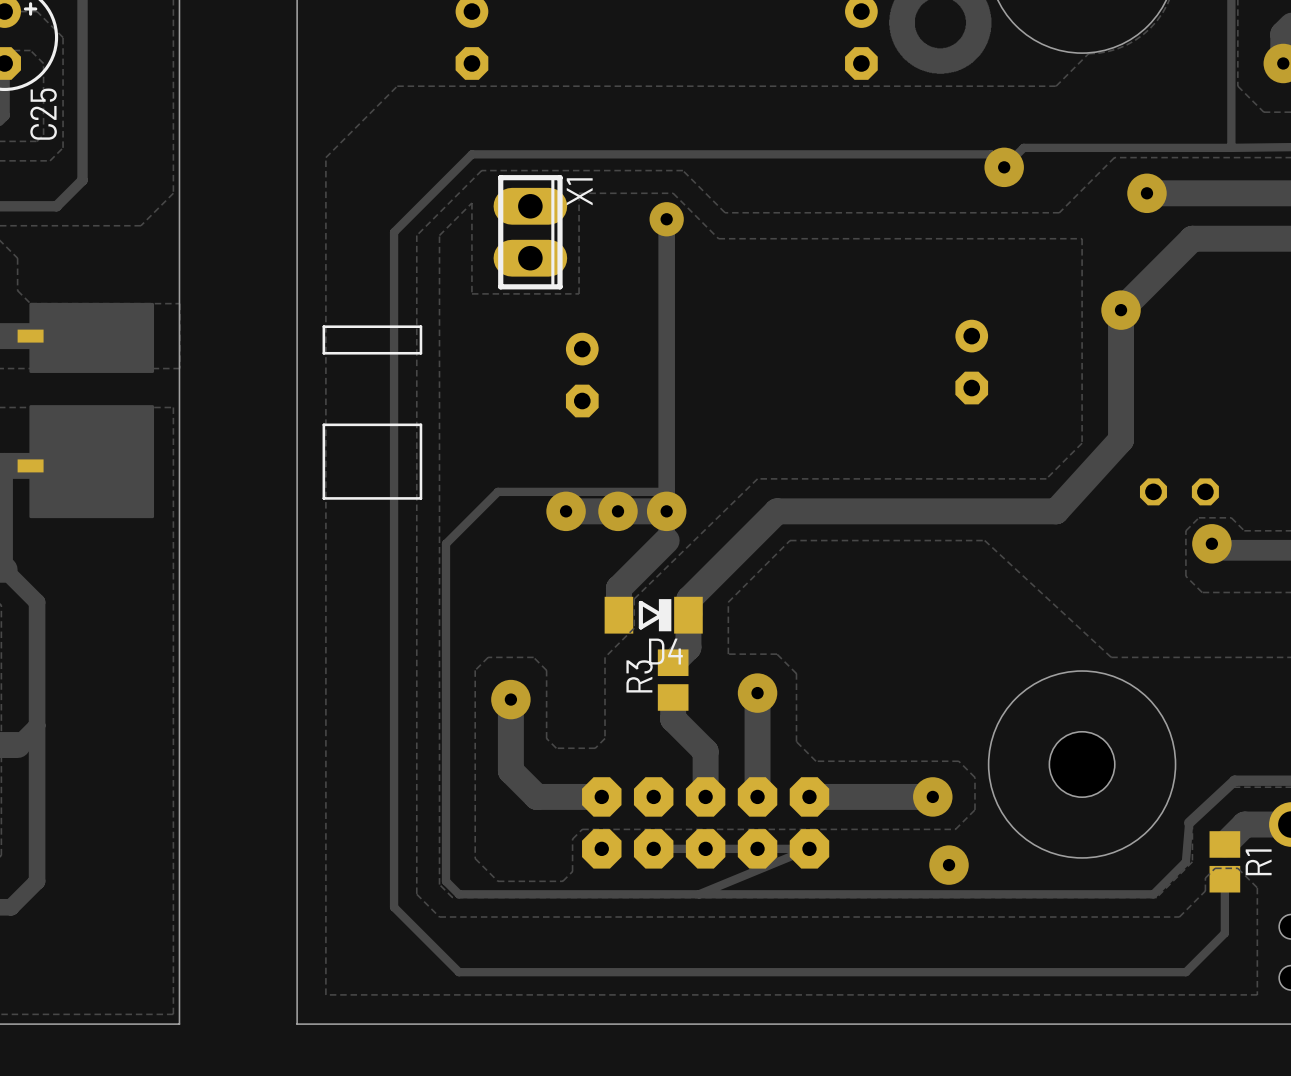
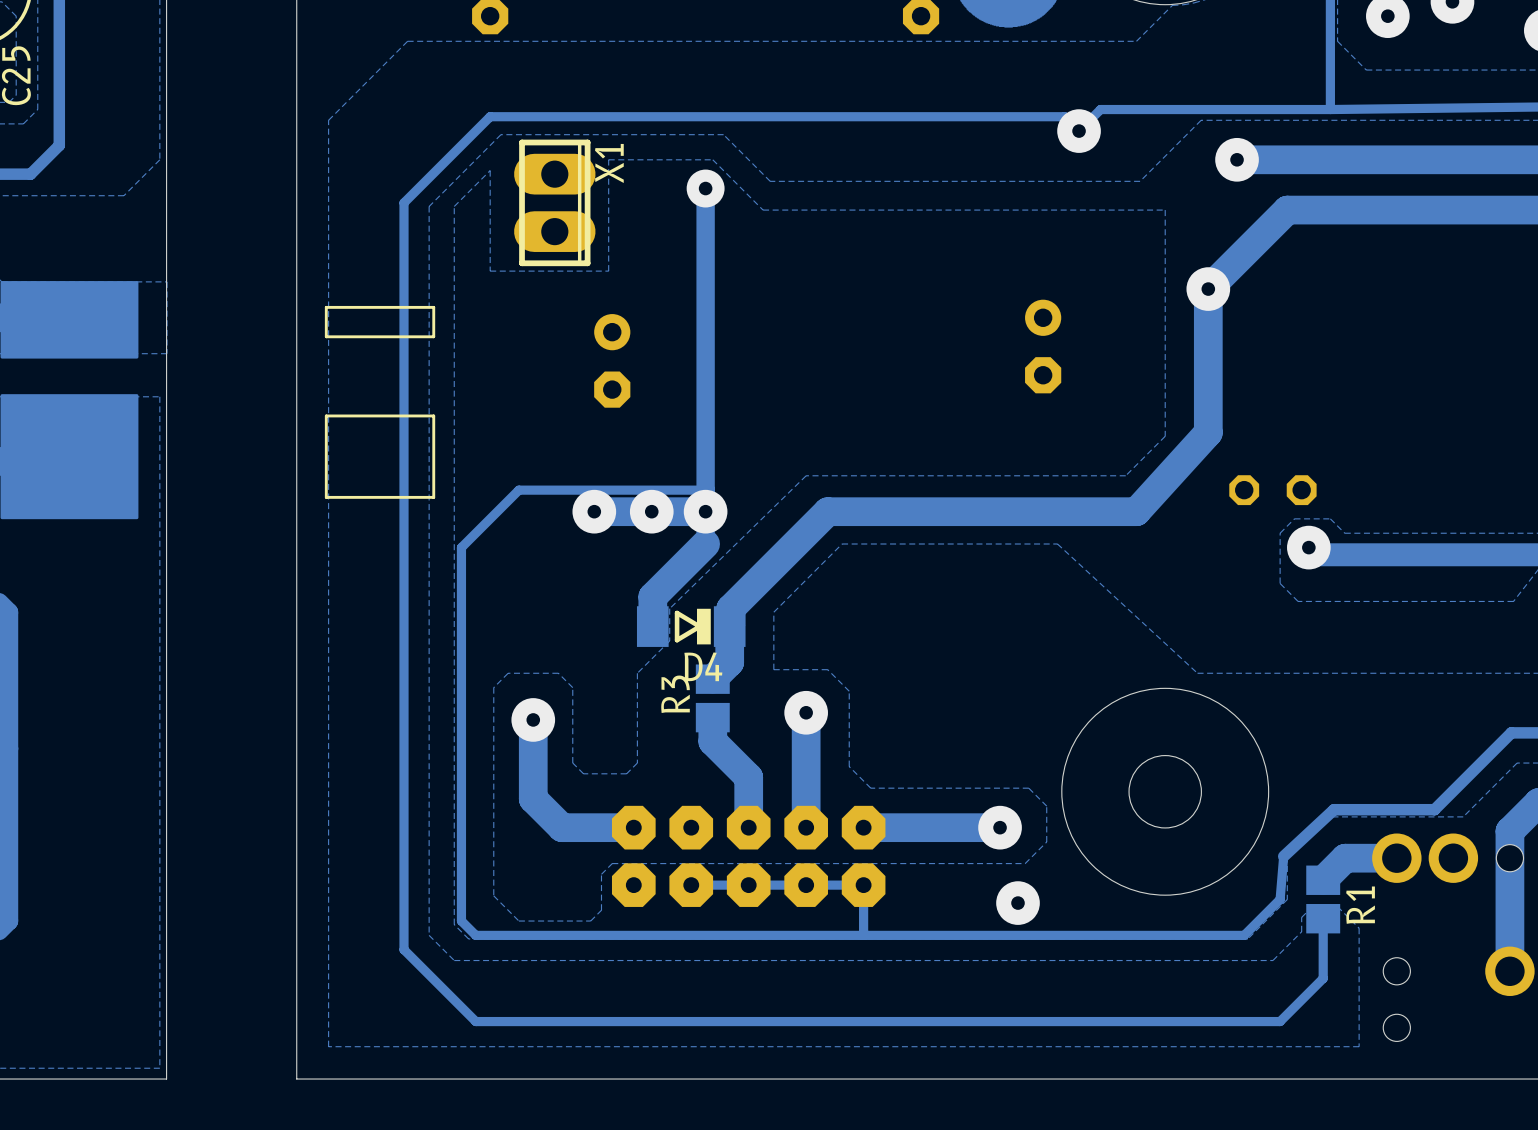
track: (809, 848) (699, 894) -> (863, 885) (863, 935)

